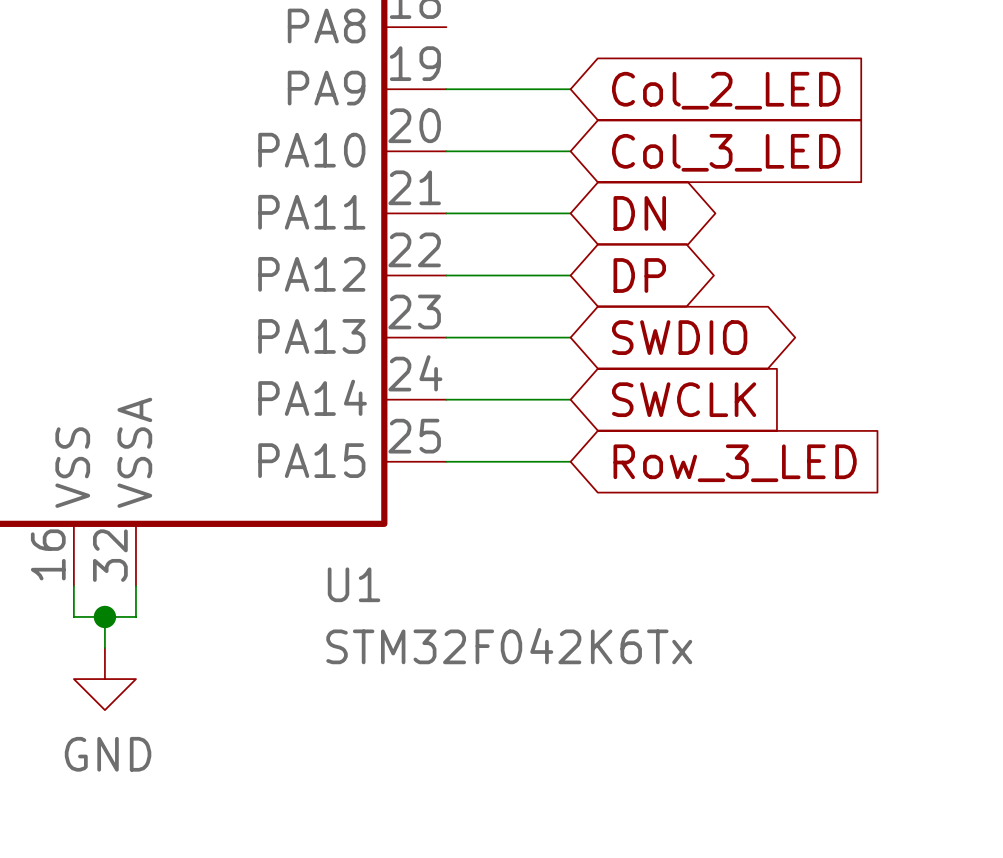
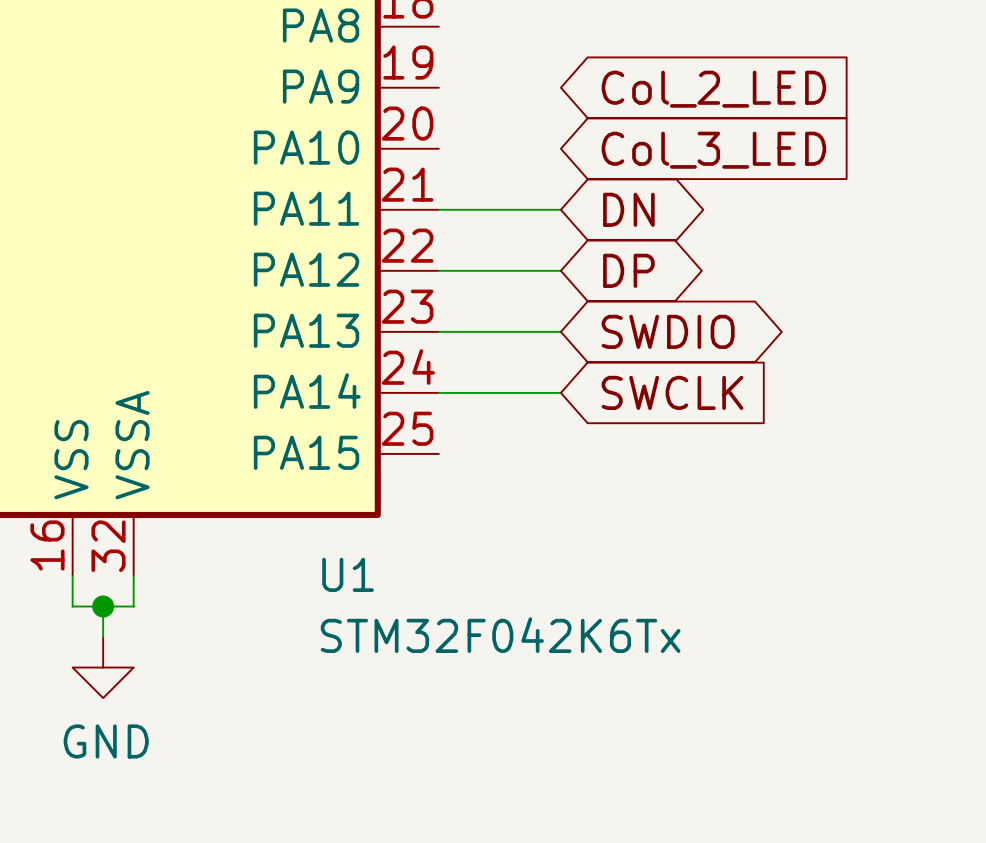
wire: (446, 89) (570, 89) -> none
wire: (446, 151) (570, 151) -> none
wire: (446, 461) (570, 461) -> none
global label: Row_3_LED (735, 463) -> none

